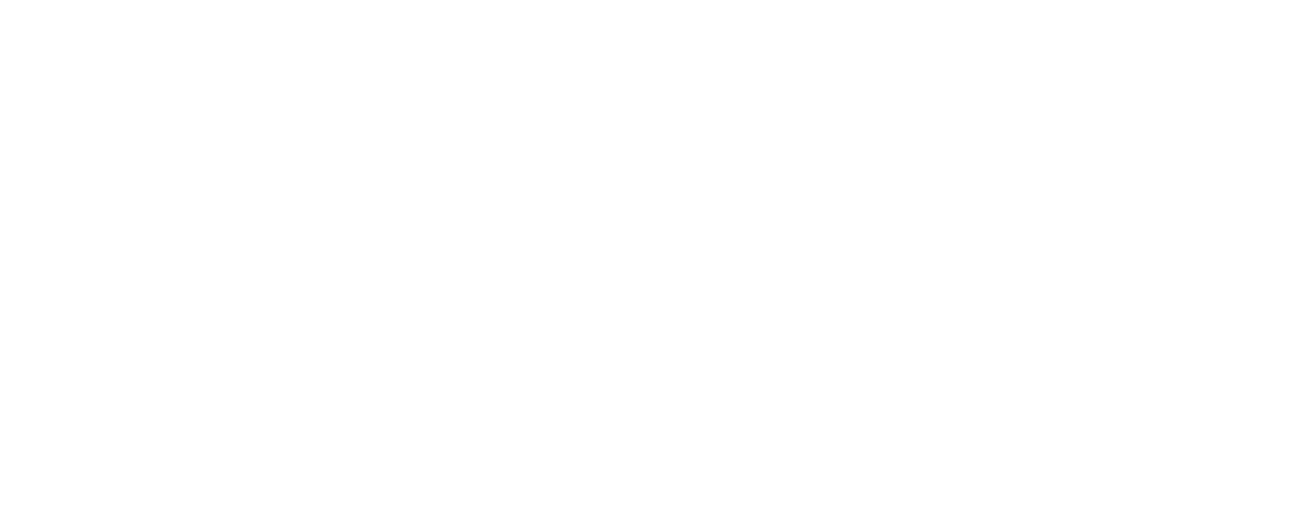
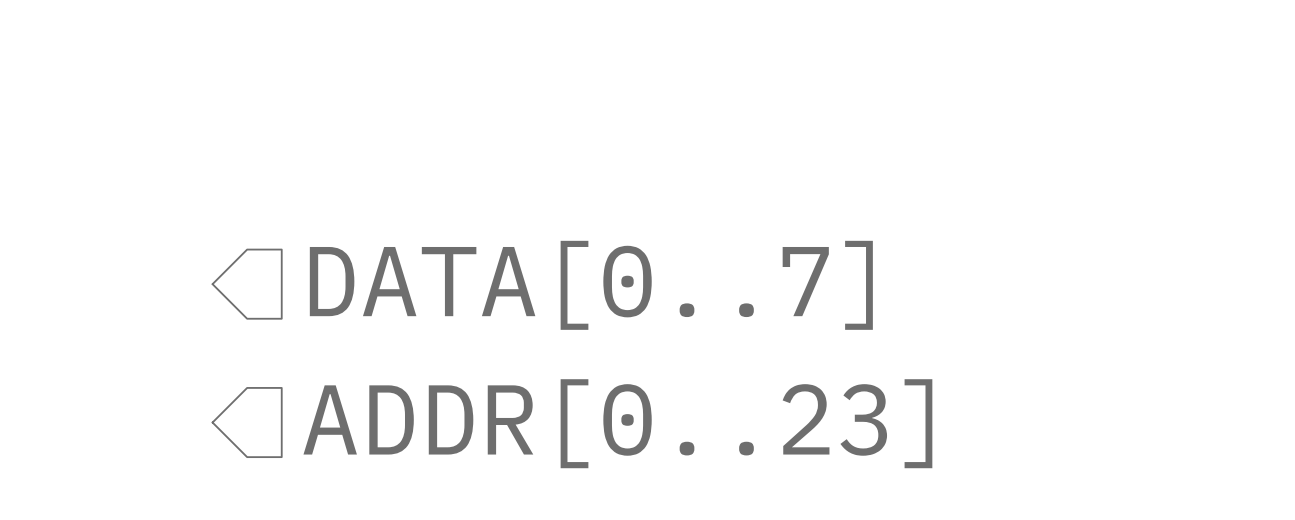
hierarchical label: none -> DATA[0..7] (591, 285)
hierarchical label: none -> ADDR[0..23] (617, 423)

